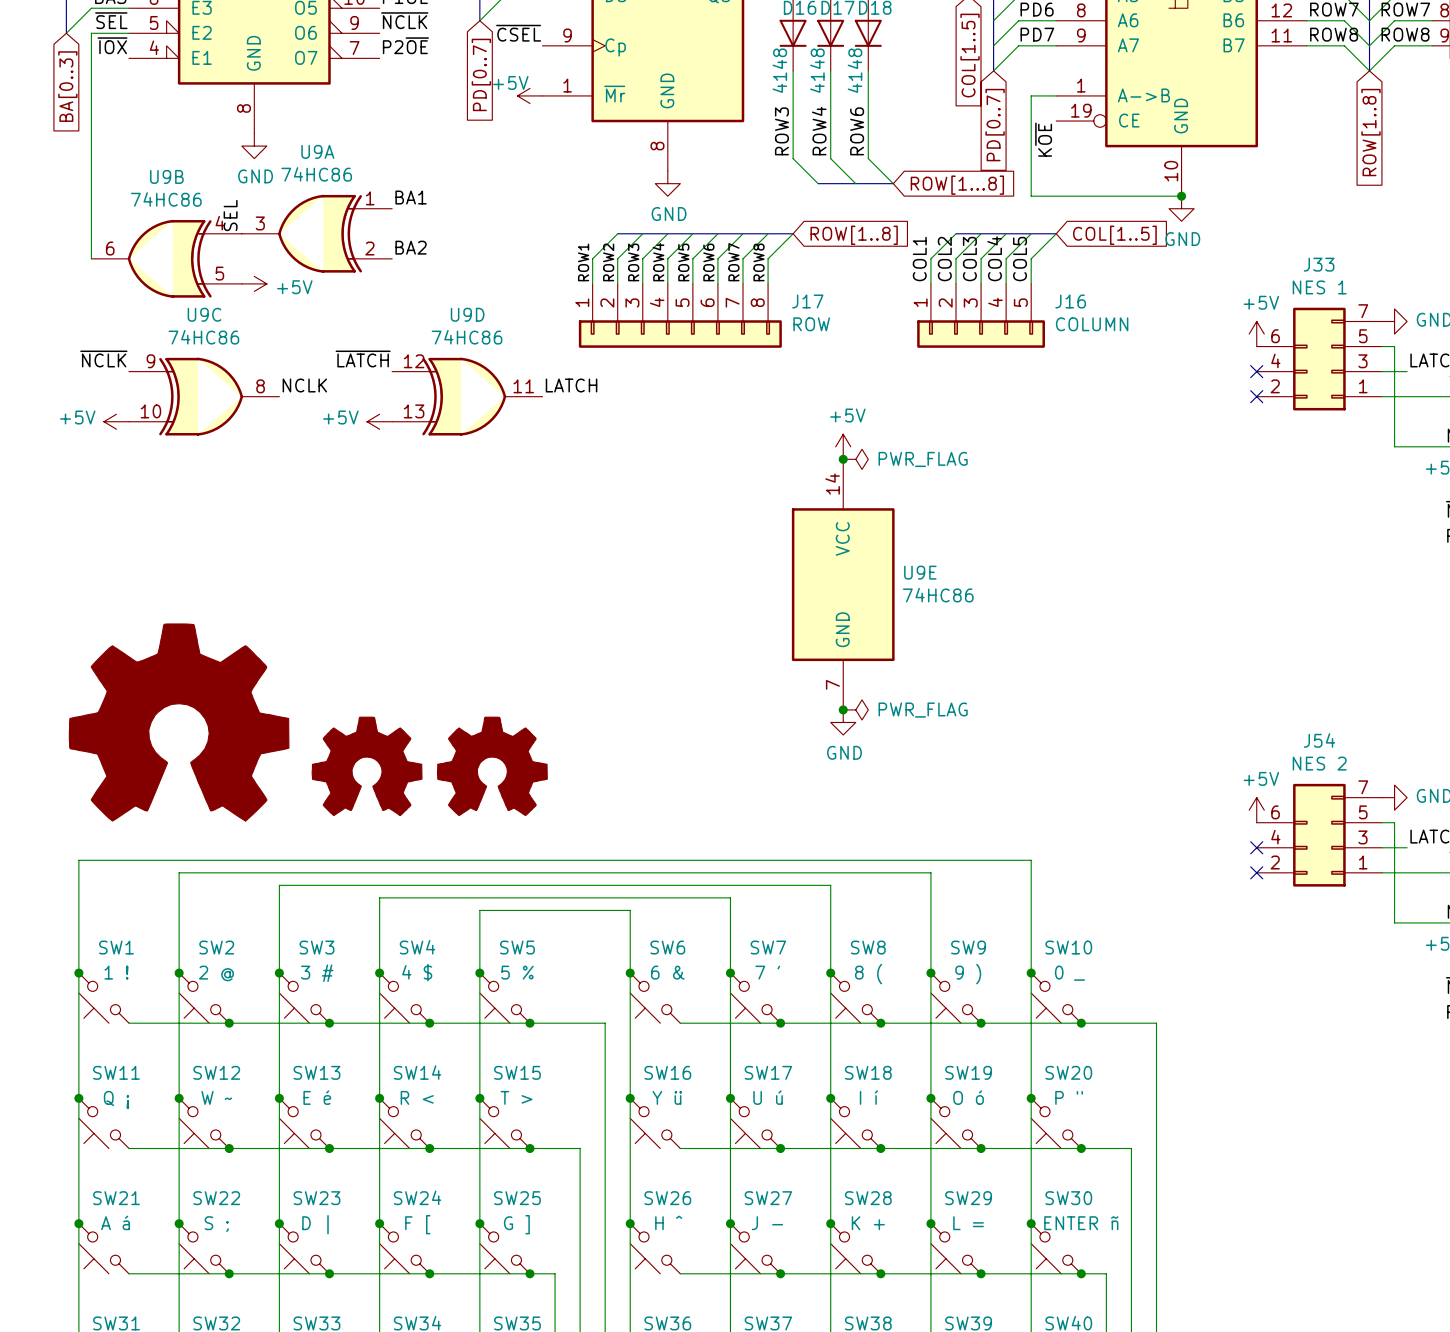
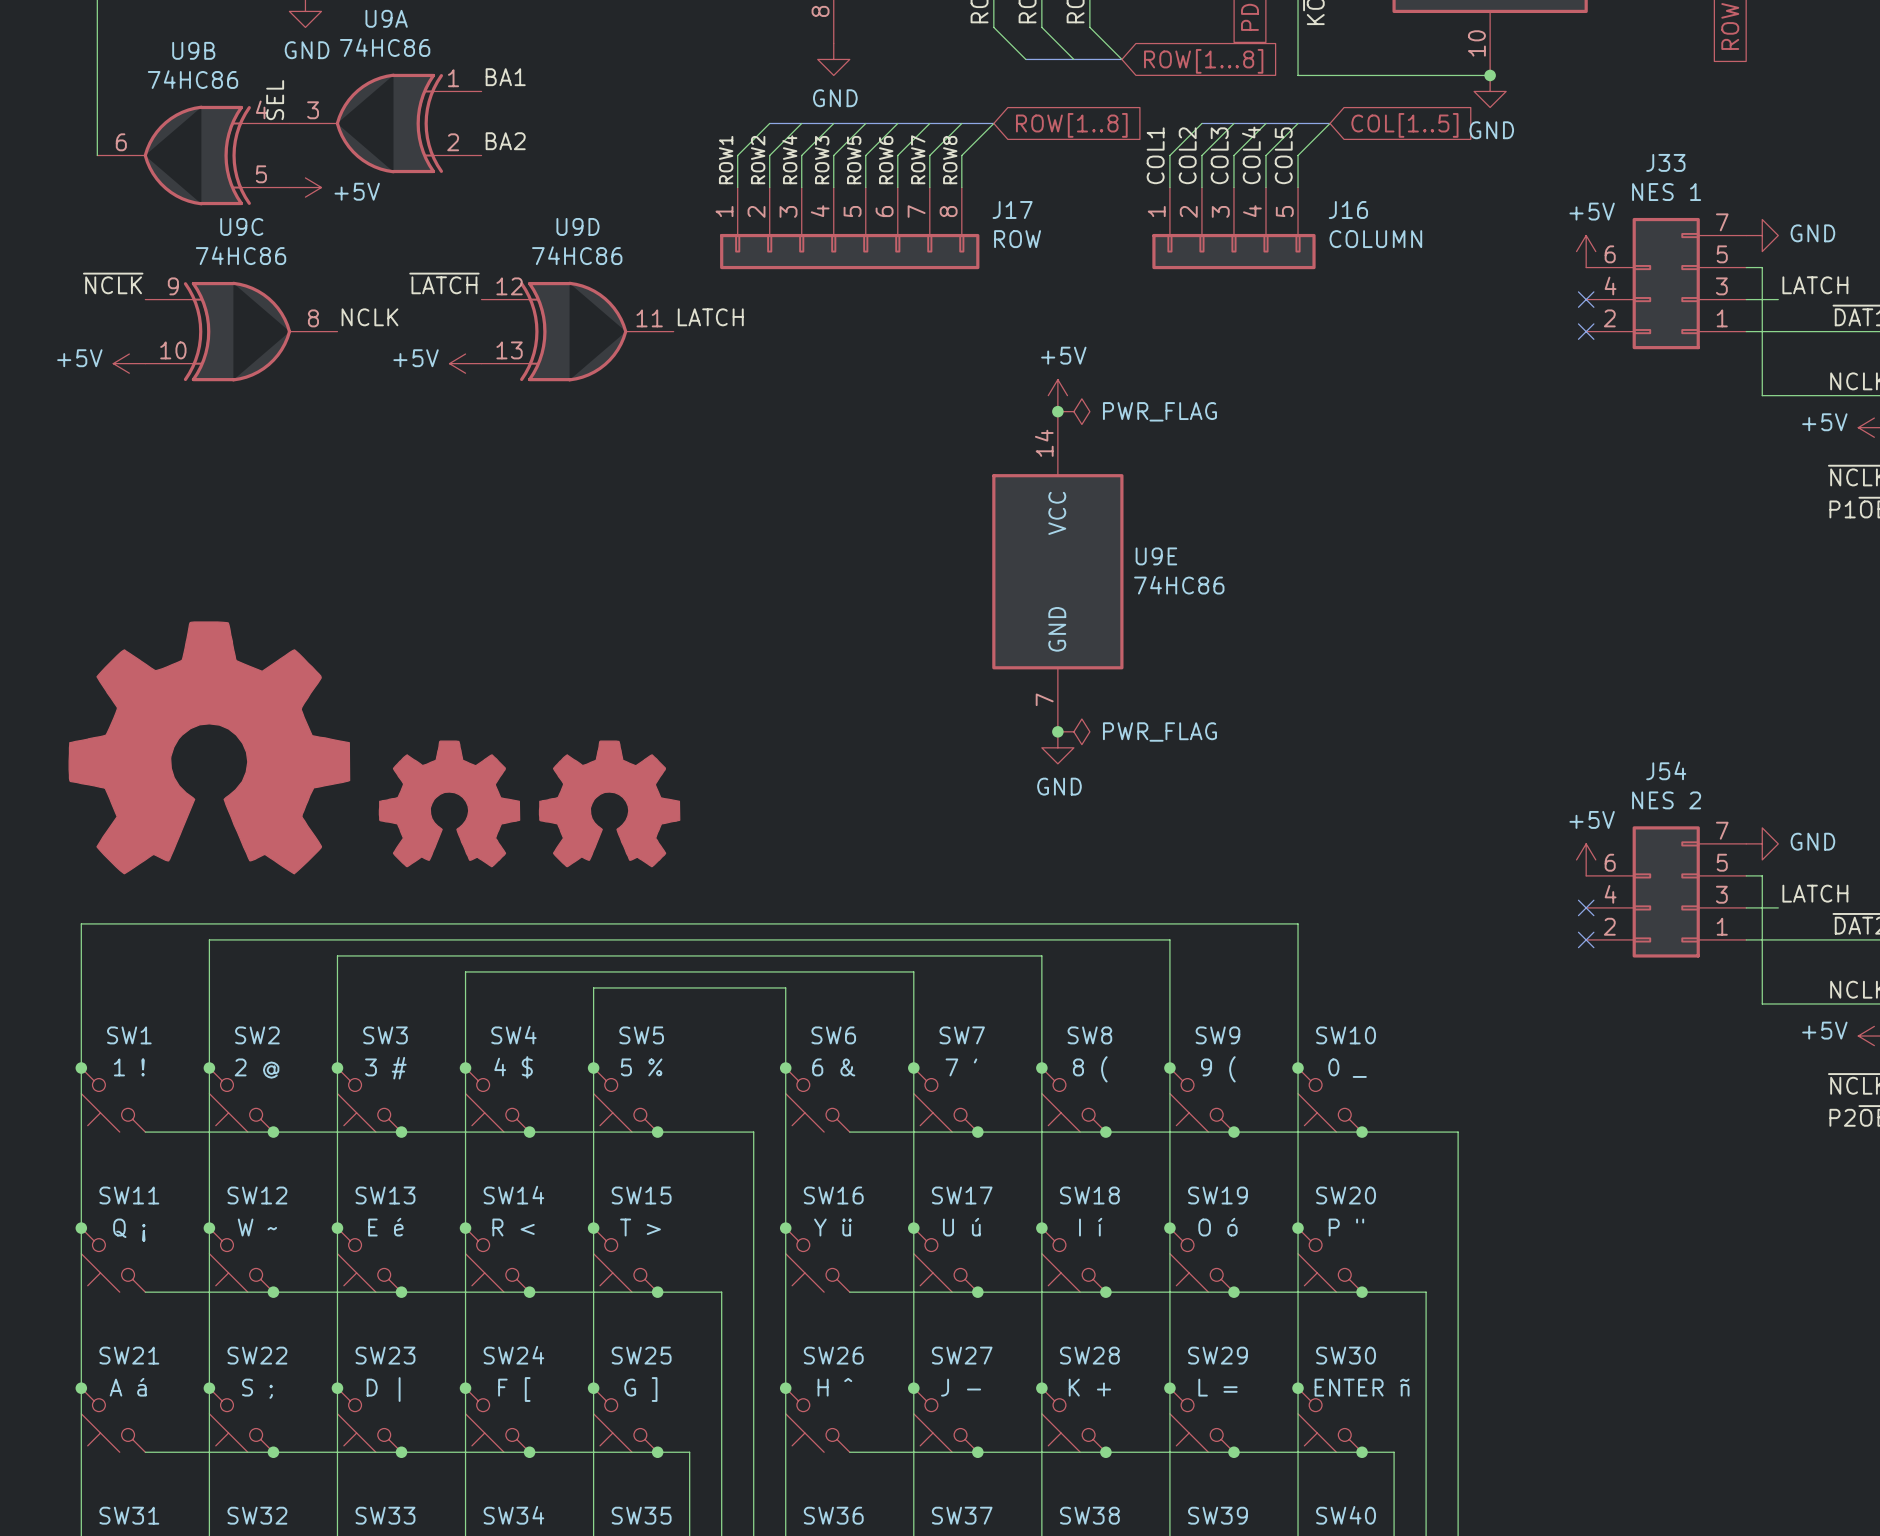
label: ROW3 (633, 262) -> ROW4 (789, 159)
label: ROW4 (658, 262) -> ROW3 (822, 160)
SW9 value: 9 ) (968, 974) -> 9 ( (1218, 1069)

